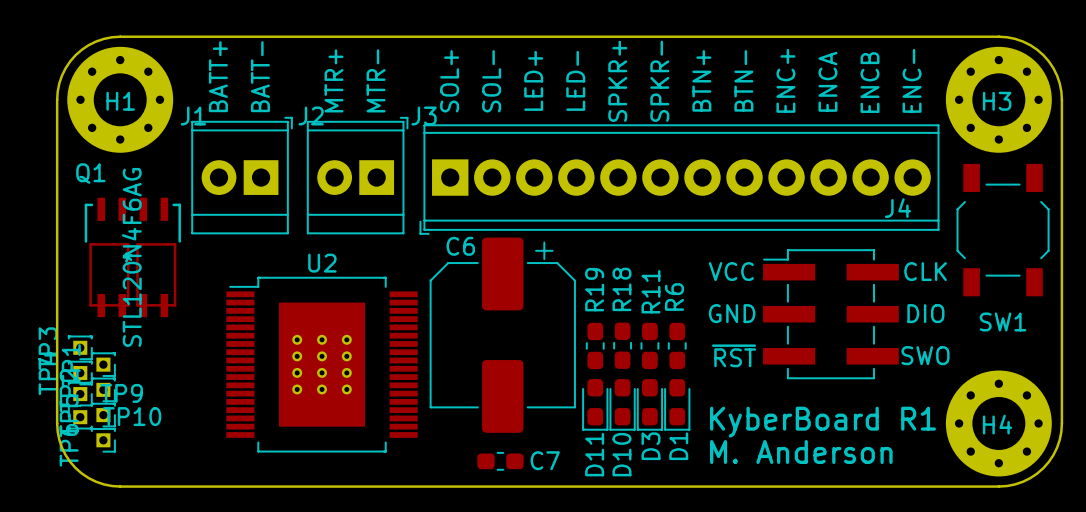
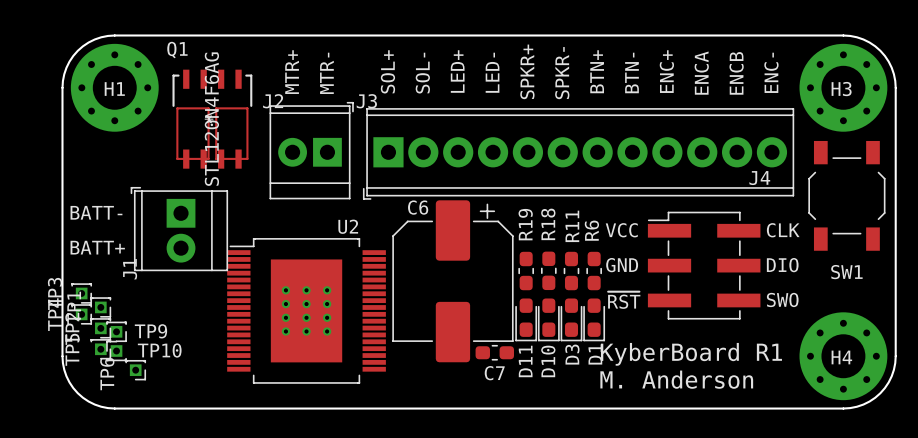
text rotation: 0° (218, 76) -> 90° clockwise (97, 247)
text position: BATT+ (218, 76) -> BATT+ (97, 247)
text rotation: 0° (260, 76) -> 90° clockwise (96, 212)
text position: BATT- (260, 76) -> BATT- (96, 212)
J1 rotation: 0° (242, 175) -> 90° counterclockwise (179, 229)
J1 position: (242, 175) -> (179, 229)
Q1 position: (132, 257) -> (212, 119)
U2 name position: U2 (322, 263) -> U2 (348, 226)
C6 position: (502, 335) -> (452, 281)
R19 position: (595, 345) -> (526, 271)
R18 position: (622, 345) -> (548, 270)
R11 position: (649, 345) -> (571, 271)
R6 position: (677, 345) -> (594, 271)
U2 position: (322, 364) -> (306, 310)
TP9 position: (80, 394) -> (116, 331)
D11 position: (595, 404) -> (526, 319)
D10 position: (622, 404) -> (548, 319)
D3 position: (649, 404) -> (571, 319)
D1 position: (677, 404) -> (594, 319)
TP10 position: (80, 417) -> (116, 351)
TP6 position: (103, 440) -> (135, 370)
C7 name position: C7 (545, 460) -> C7 (494, 373)
C7 position: (500, 461) -> (494, 352)

